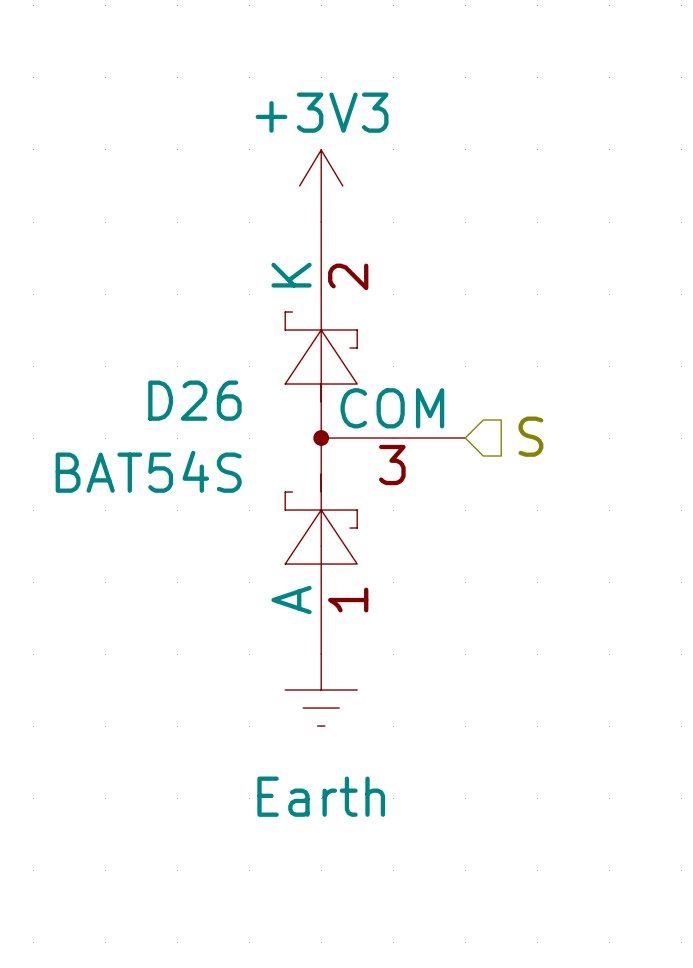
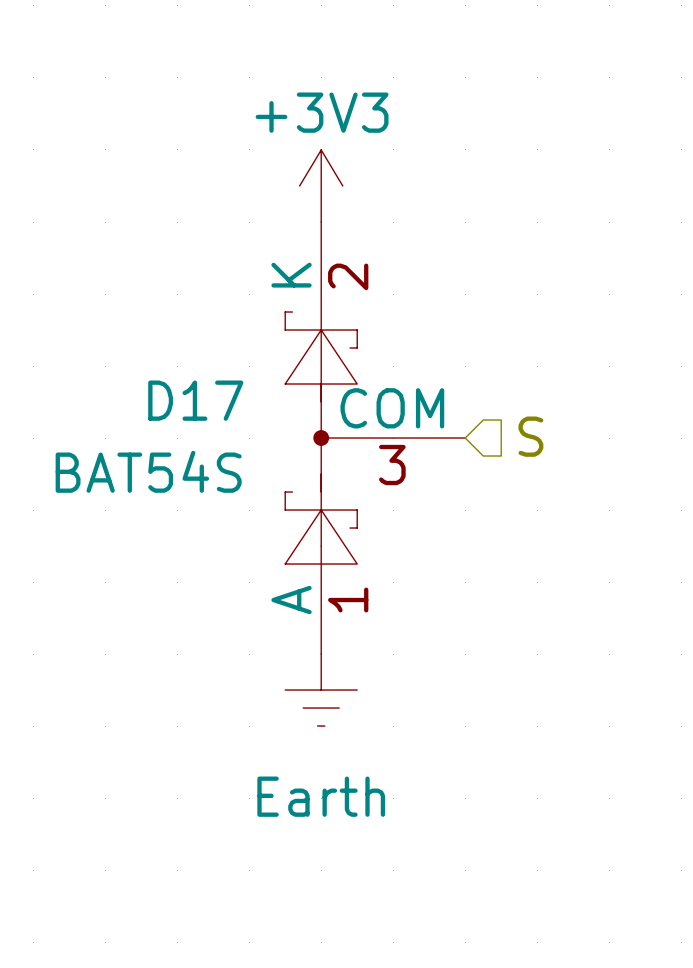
D26 name: D26 (194, 400) -> D17 (195, 400)

